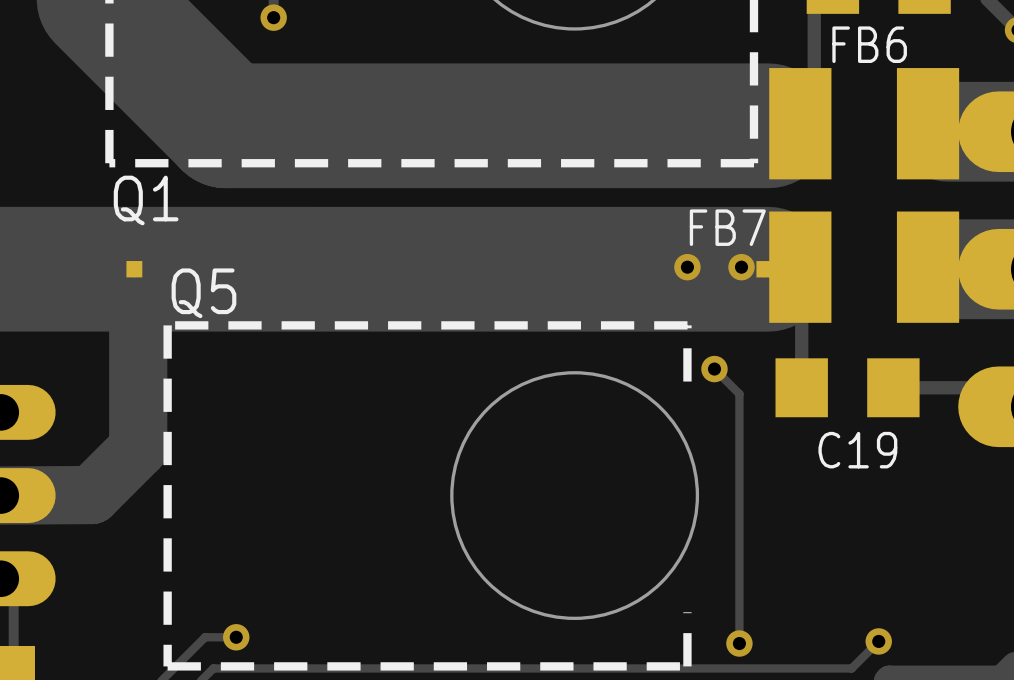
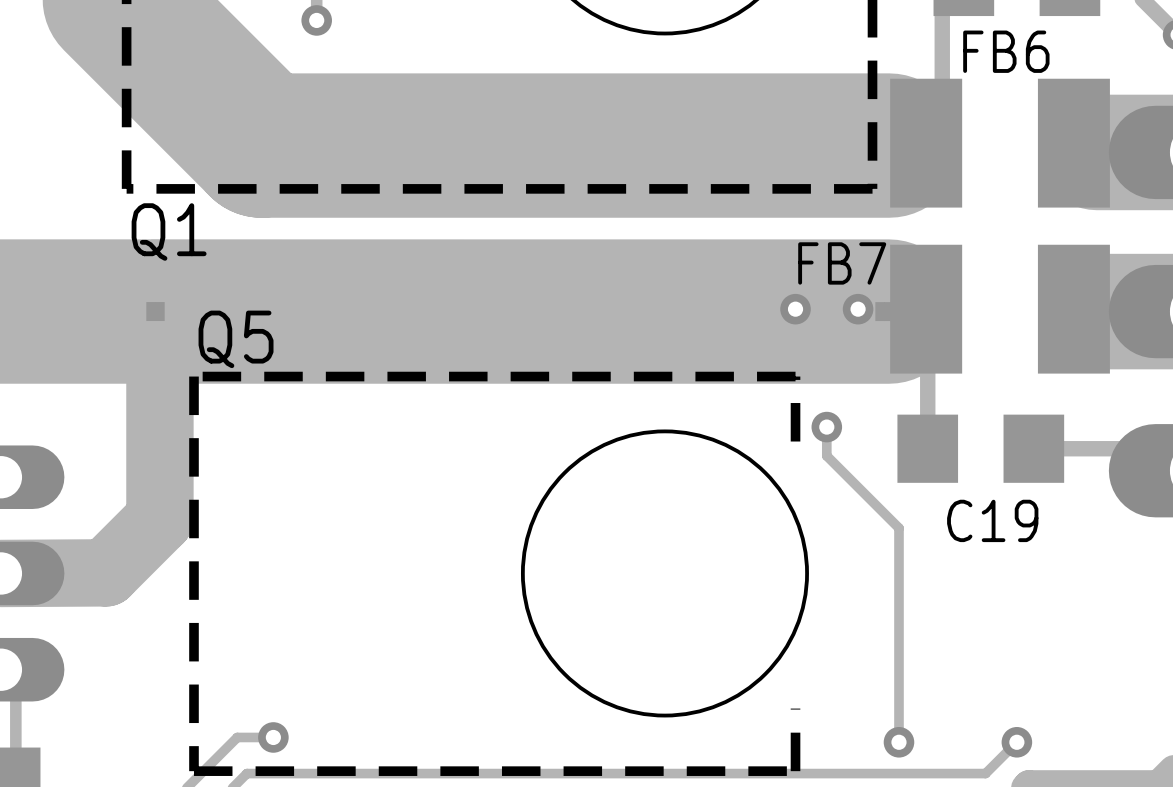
track: (714, 369) (739, 394) (739, 643) -> (826, 427) (826, 455) (898, 528) (898, 742)
via position: (739, 643) -> (898, 742)

